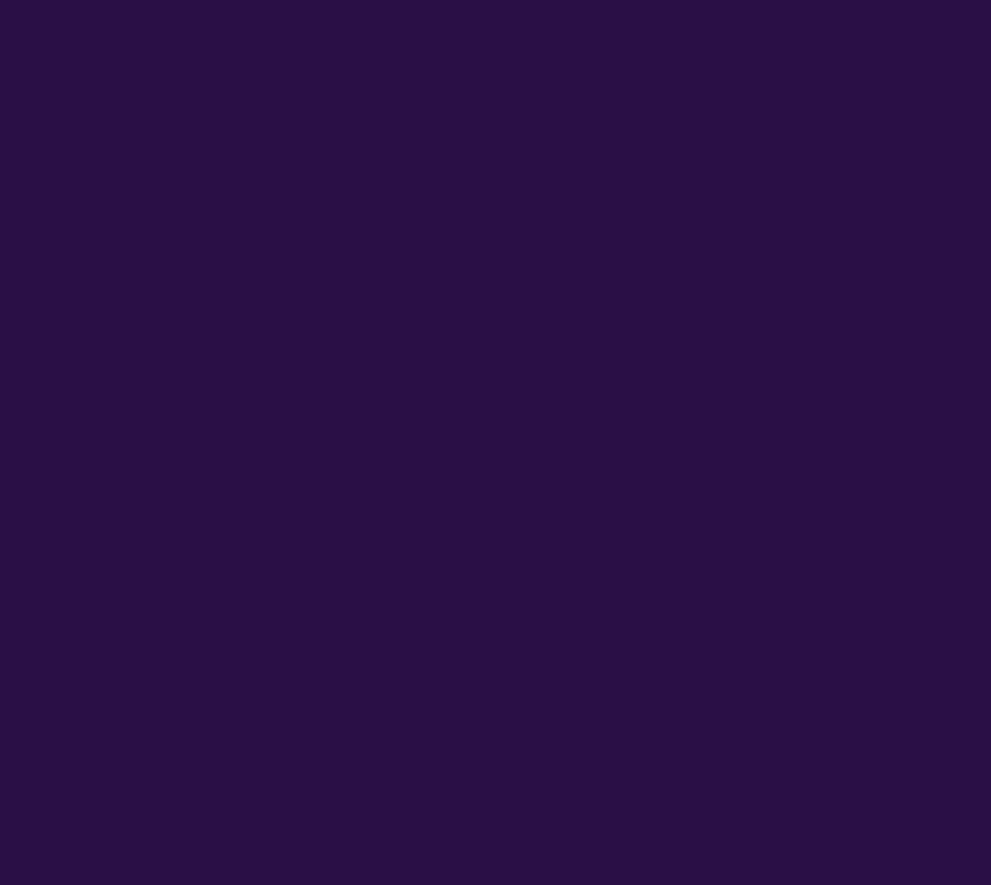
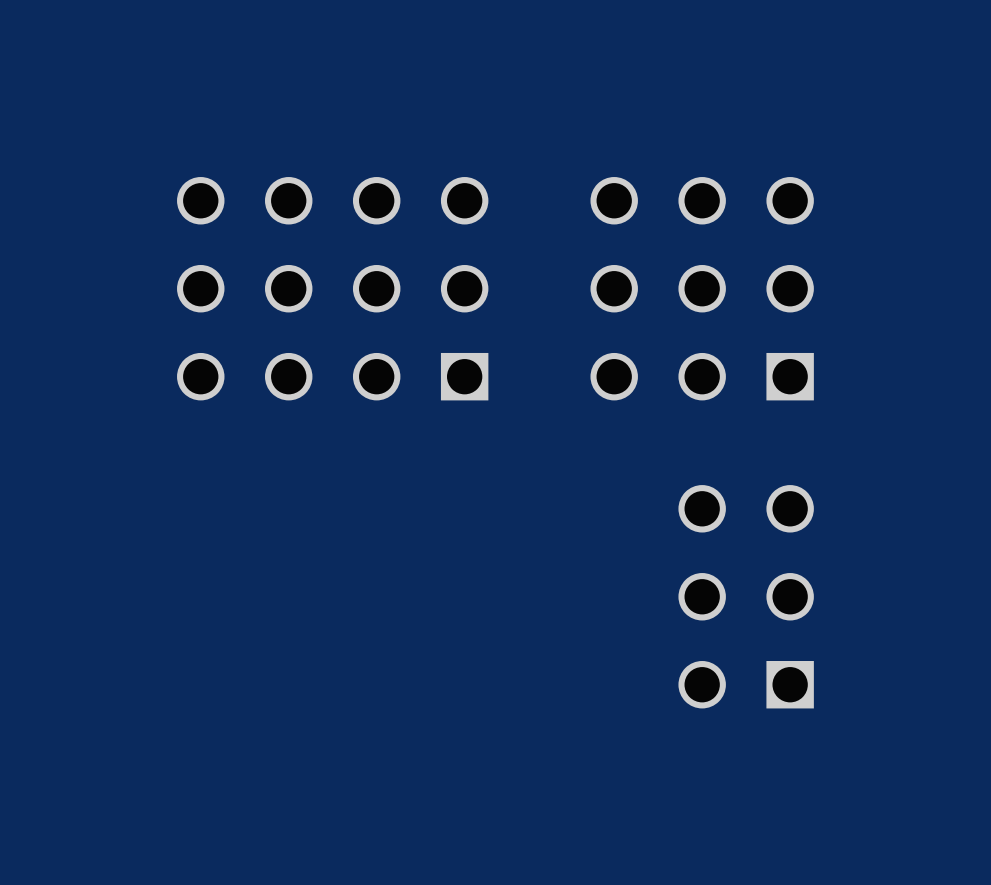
part: none -> (332, 288)
part: none -> (702, 288)
part: none -> (746, 596)

